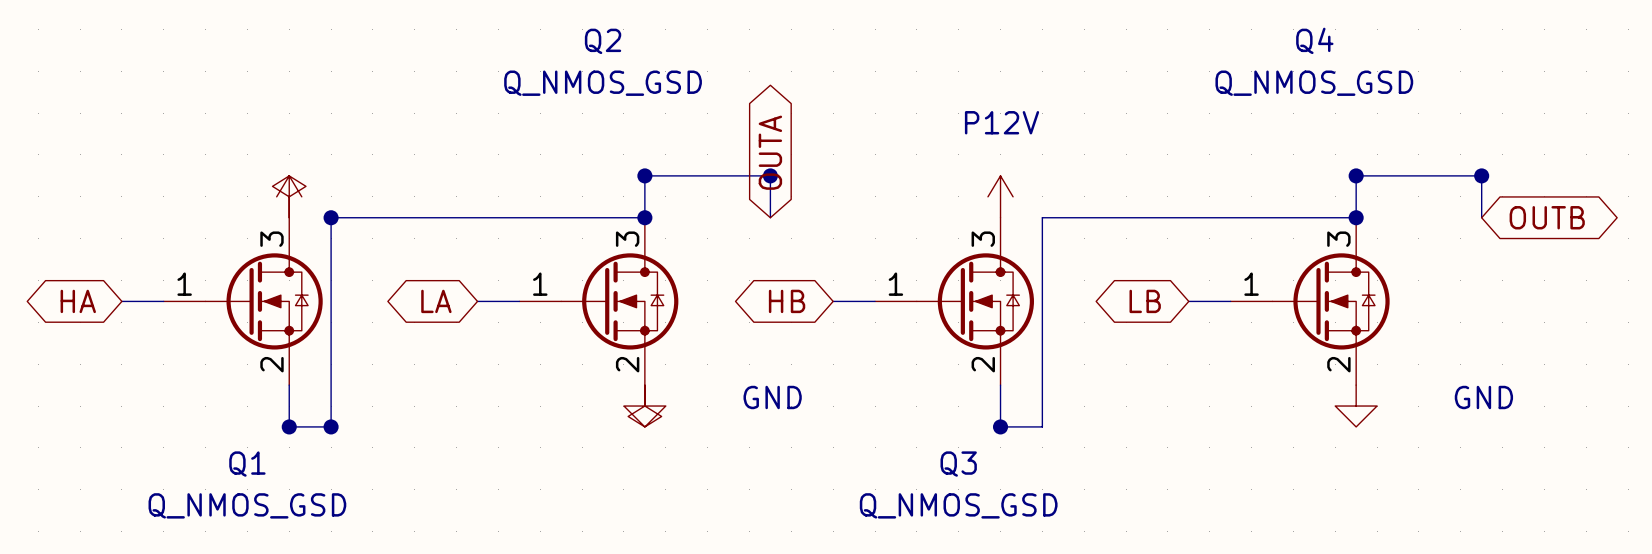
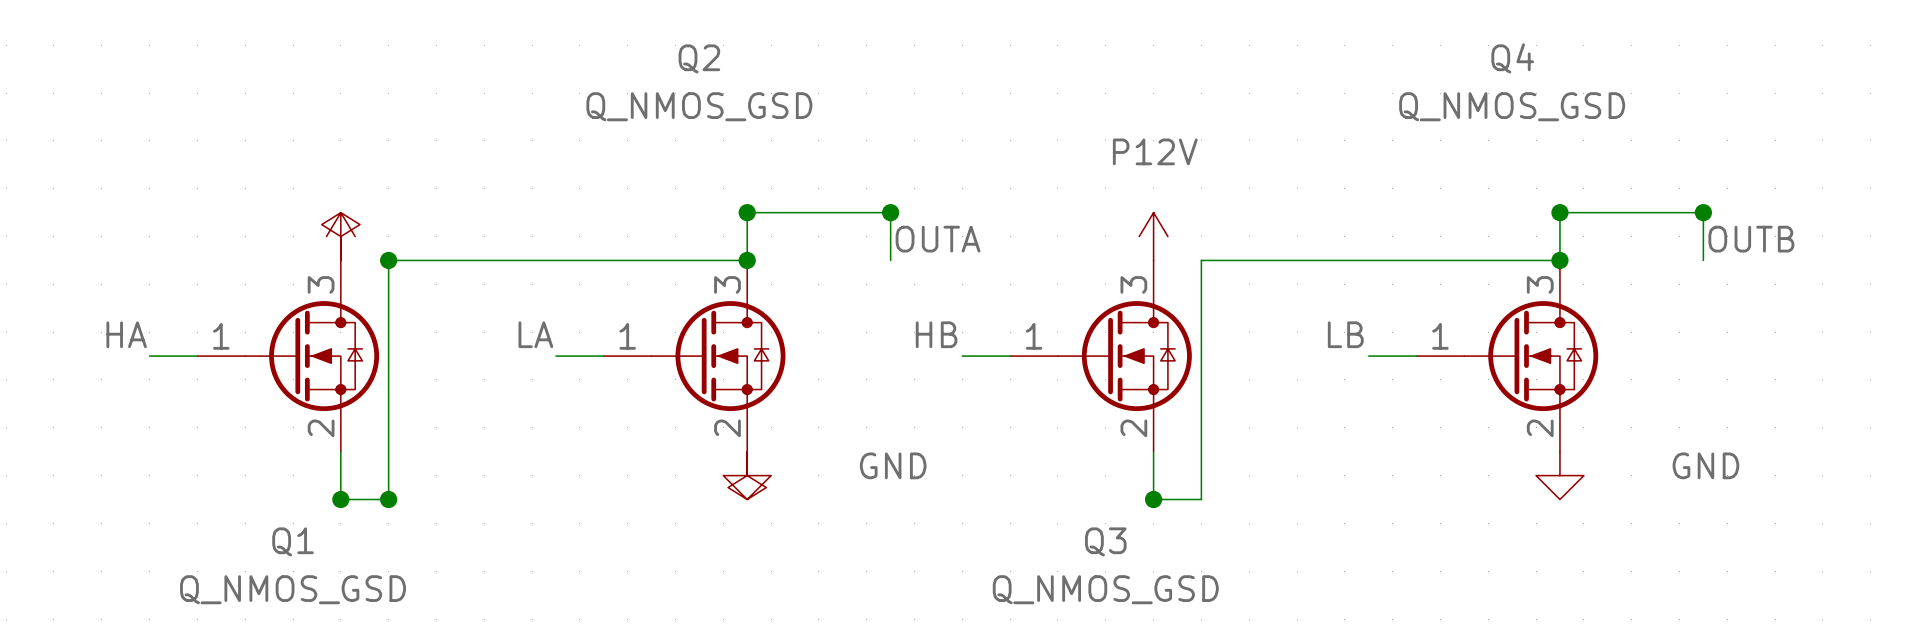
global label: OUTA (770, 152) -> none
label: none -> OUTA (938, 239)
label: none -> OUTB (1751, 239)
global label: OUTB (1547, 217) -> none
label: none -> HA (126, 334)
label: none -> LA (535, 334)
label: none -> HB (936, 334)
label: none -> LB (1345, 334)
global label: HA (78, 301) -> none
global label: LA (436, 301) -> none
global label: HB (787, 301) -> none
global label: LB (1145, 301) -> none

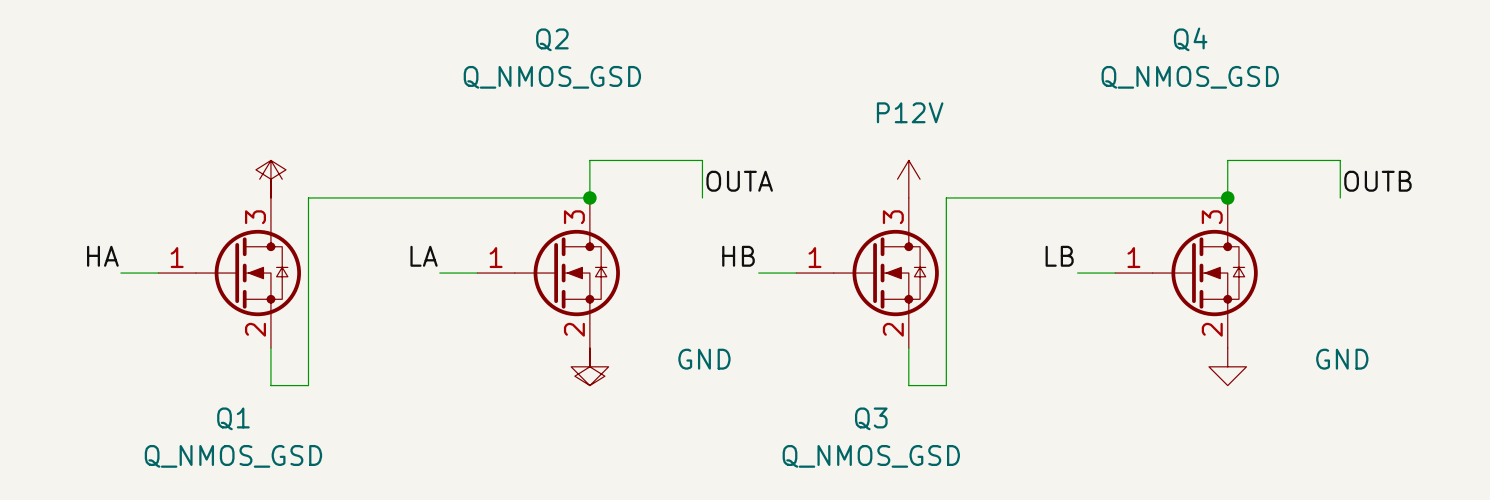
junction: (747, 212) -> none
junction: (890, 212) -> none
junction: (1559, 212) -> none
junction: (1703, 212) -> none
junction: (388, 260) -> none
junction: (340, 499) -> none
junction: (388, 499) -> none
junction: (1153, 499) -> none

